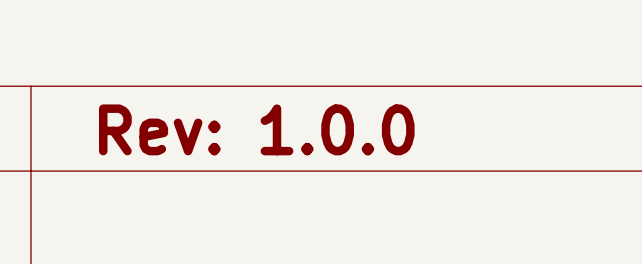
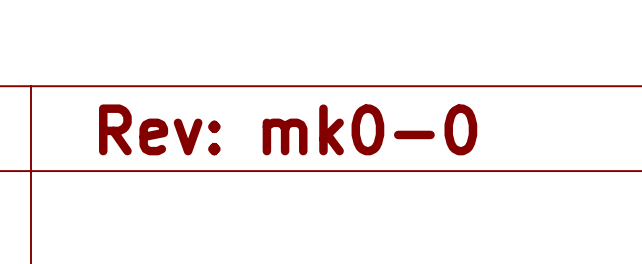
title block: Rev: 1.0.0 (256, 129) -> Rev: mk0-0 (288, 129)

